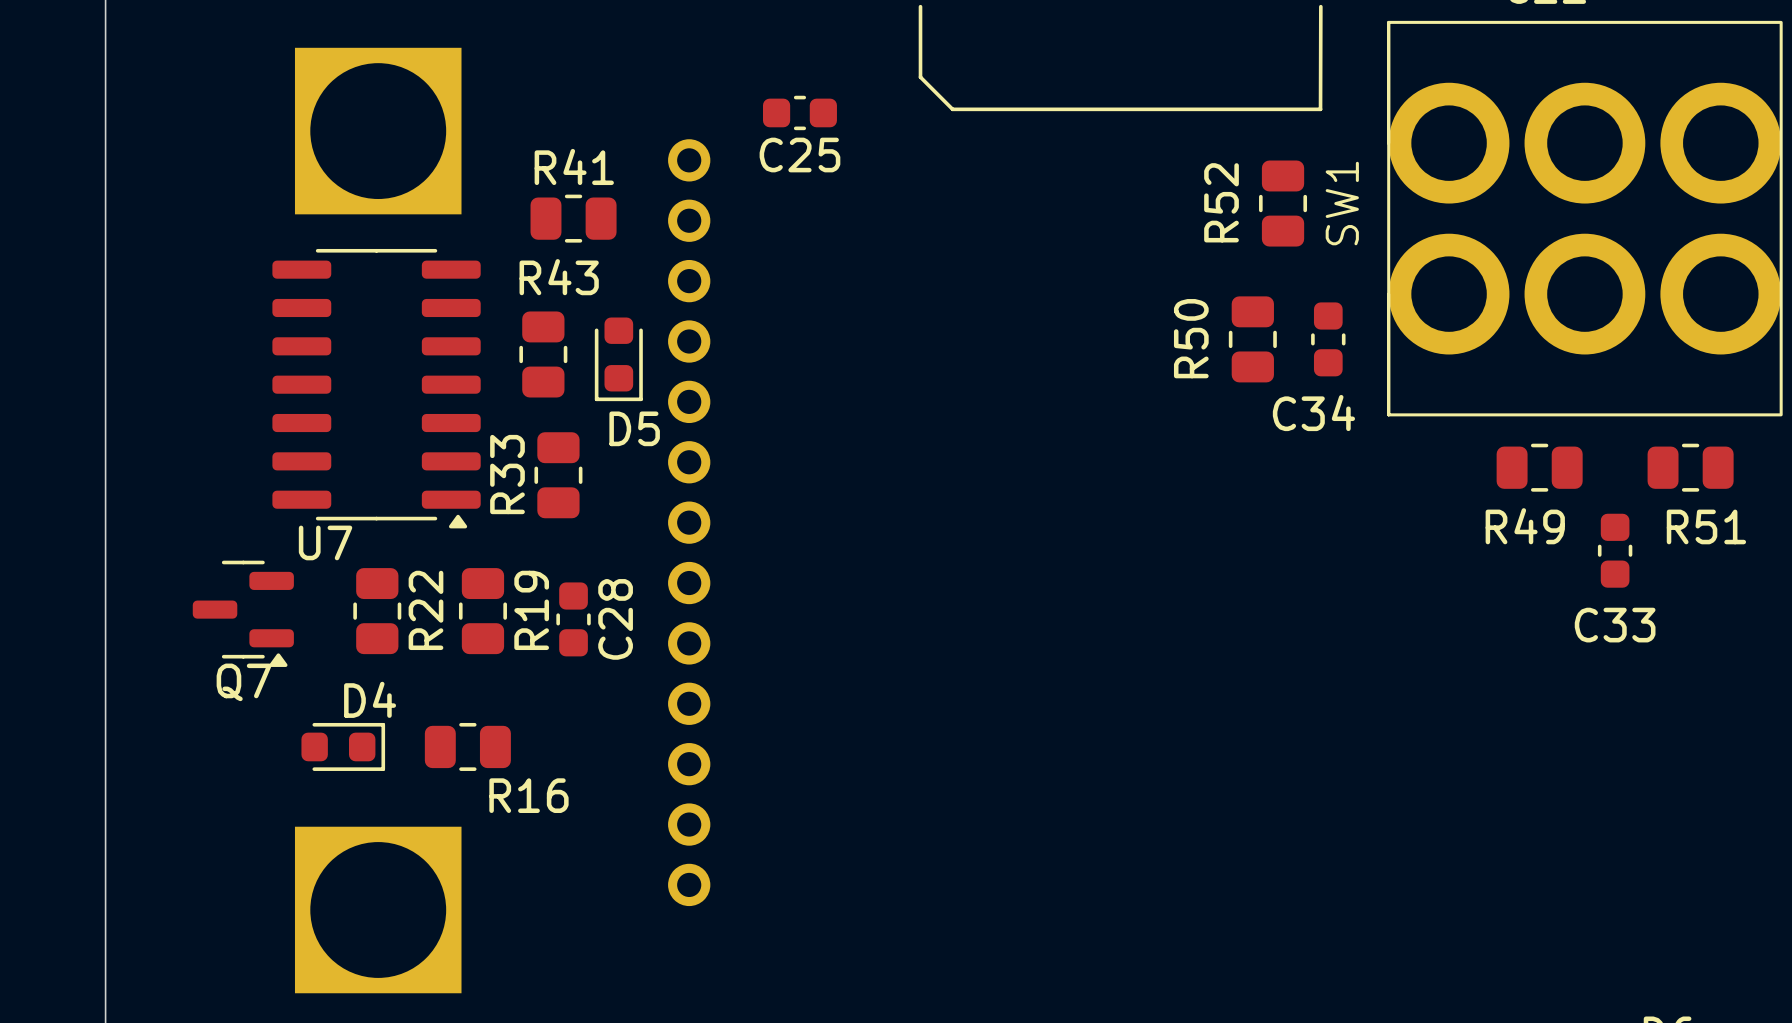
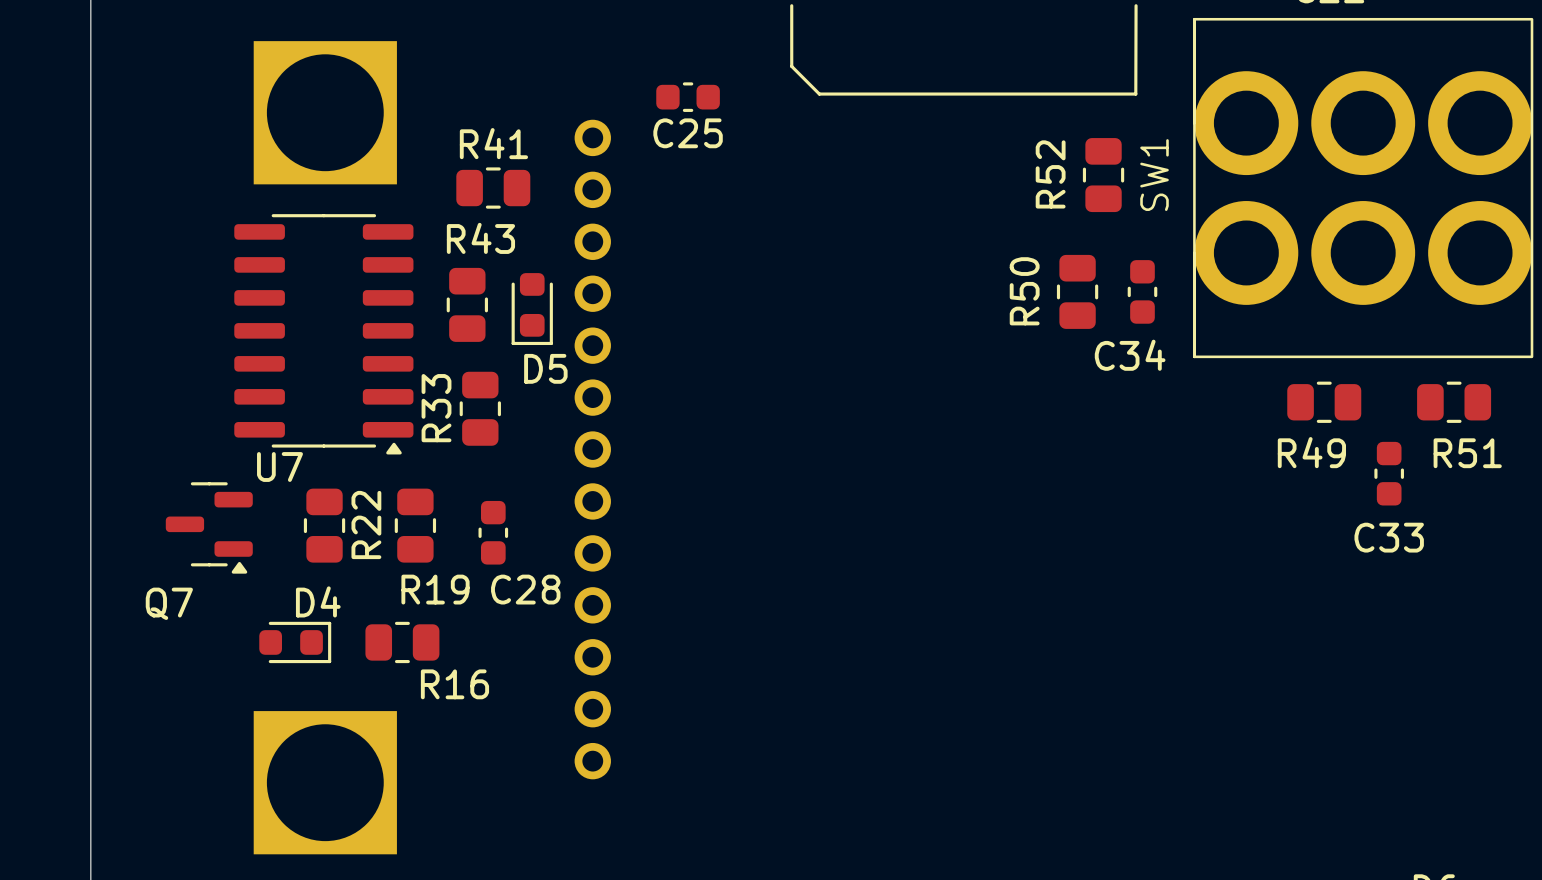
R19 name rotation: 0° (531, 610) -> 90° clockwise (435, 589)
C28 name rotation: 0° (615, 619) -> 90° clockwise (525, 589)
Q7 name position: Q7 (244, 682) -> Q7 (169, 603)

